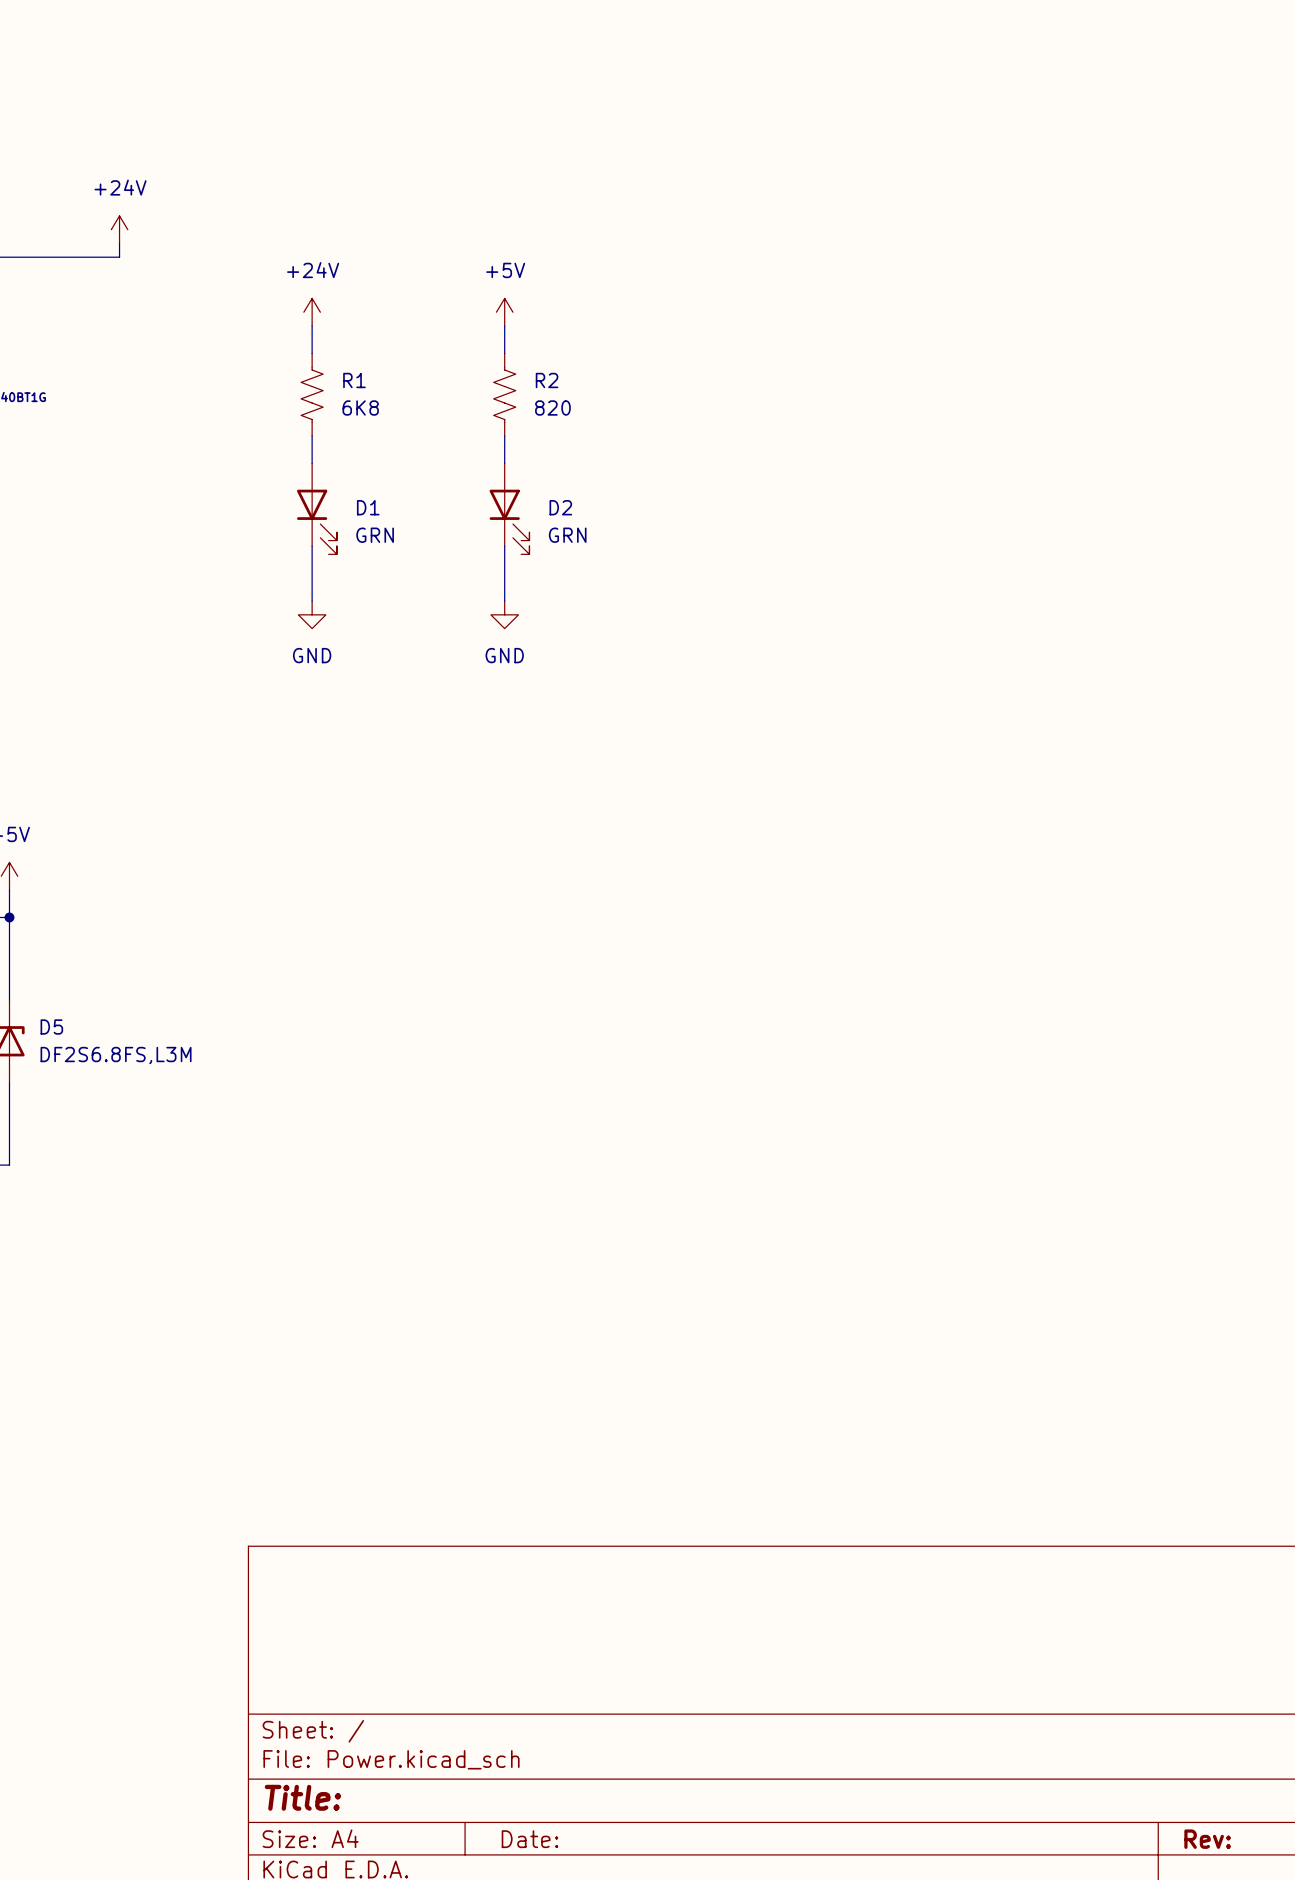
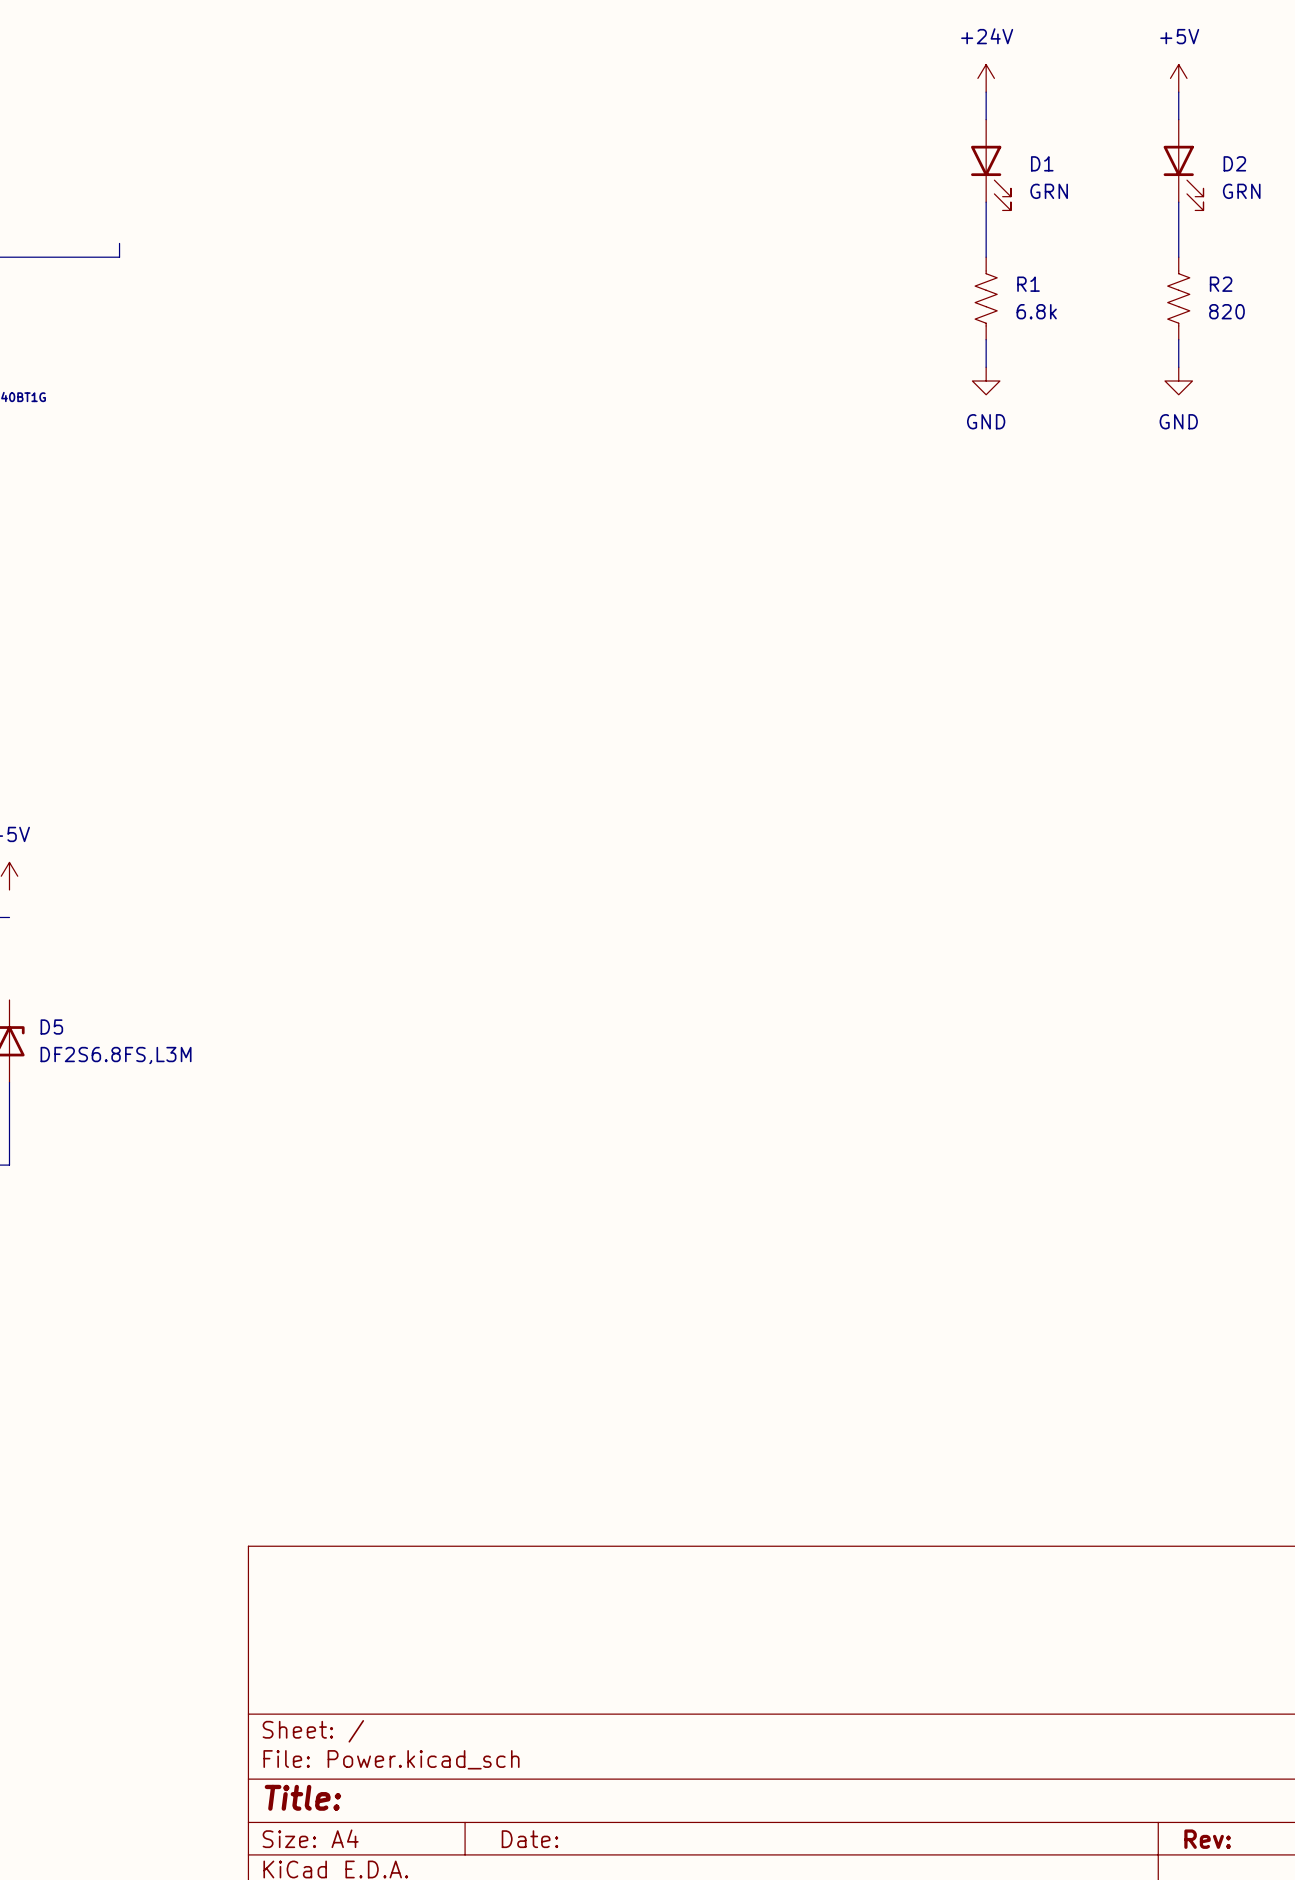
power symbol: none -> +24V (986, 78)
power symbol: none -> +5V (1178, 78)
wire: none -> (986, 92) (986, 119)
wire: none -> (1178, 92) (1178, 119)
wire: none -> (986, 202) (986, 257)
wire: none -> (1178, 202) (1178, 257)
power symbol: +24V (119, 229) -> none
power symbol: +24V (312, 312) -> none
power symbol: +5V (504, 312) -> none
wire: (312, 325) (312, 353) -> none
wire: (504, 325) (504, 353) -> none
wire: none -> (986, 339) (986, 367)
wire: none -> (1178, 339) (1178, 367)
power symbol: none -> GND (986, 381)
power symbol: none -> GND (1178, 381)
R1 position: (312, 394) -> (986, 298)
R2 position: (504, 394) -> (1178, 298)
R1 value: 6K8 (360, 408) -> 6.8k (1036, 311)
wire: (312, 436) (312, 463) -> none
wire: (504, 436) (504, 463) -> none
D1 position: (316, 508) -> (990, 165)
D2 position: (509, 508) -> (1183, 165)
wire: (312, 546) (312, 601) -> none
wire: (504, 546) (504, 601) -> none
power symbol: GND (312, 614) -> none
power symbol: GND (504, 614) -> none
wire: (9, 889) (9, 1000) -> none
junction: (9, 917) -> none

